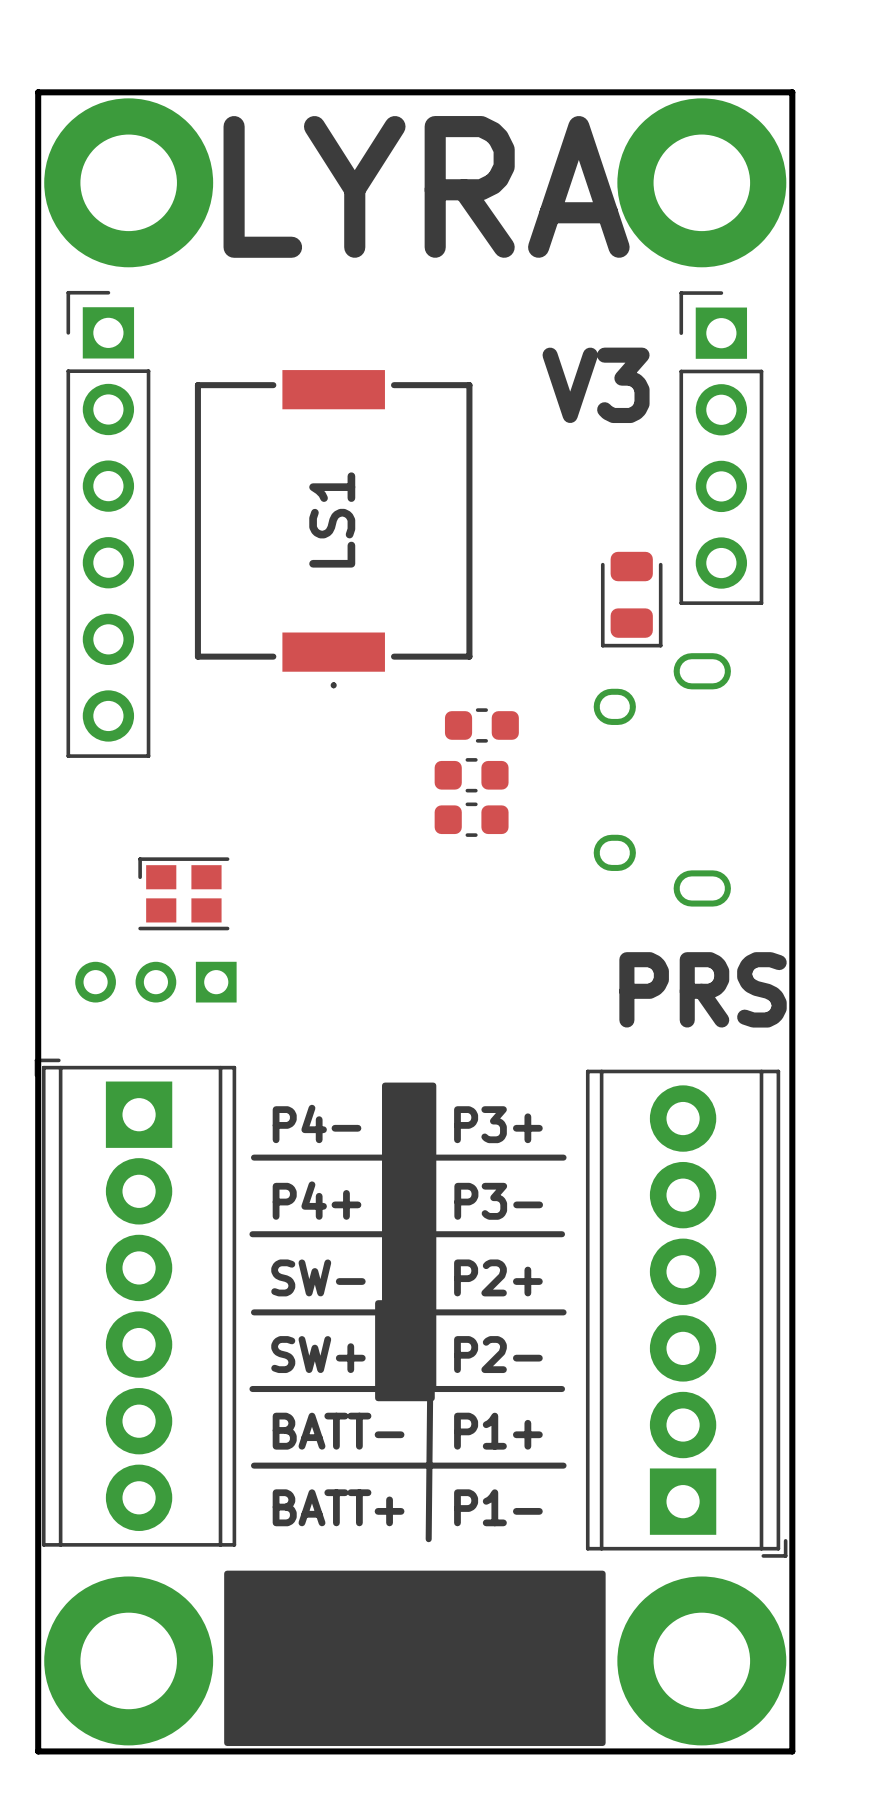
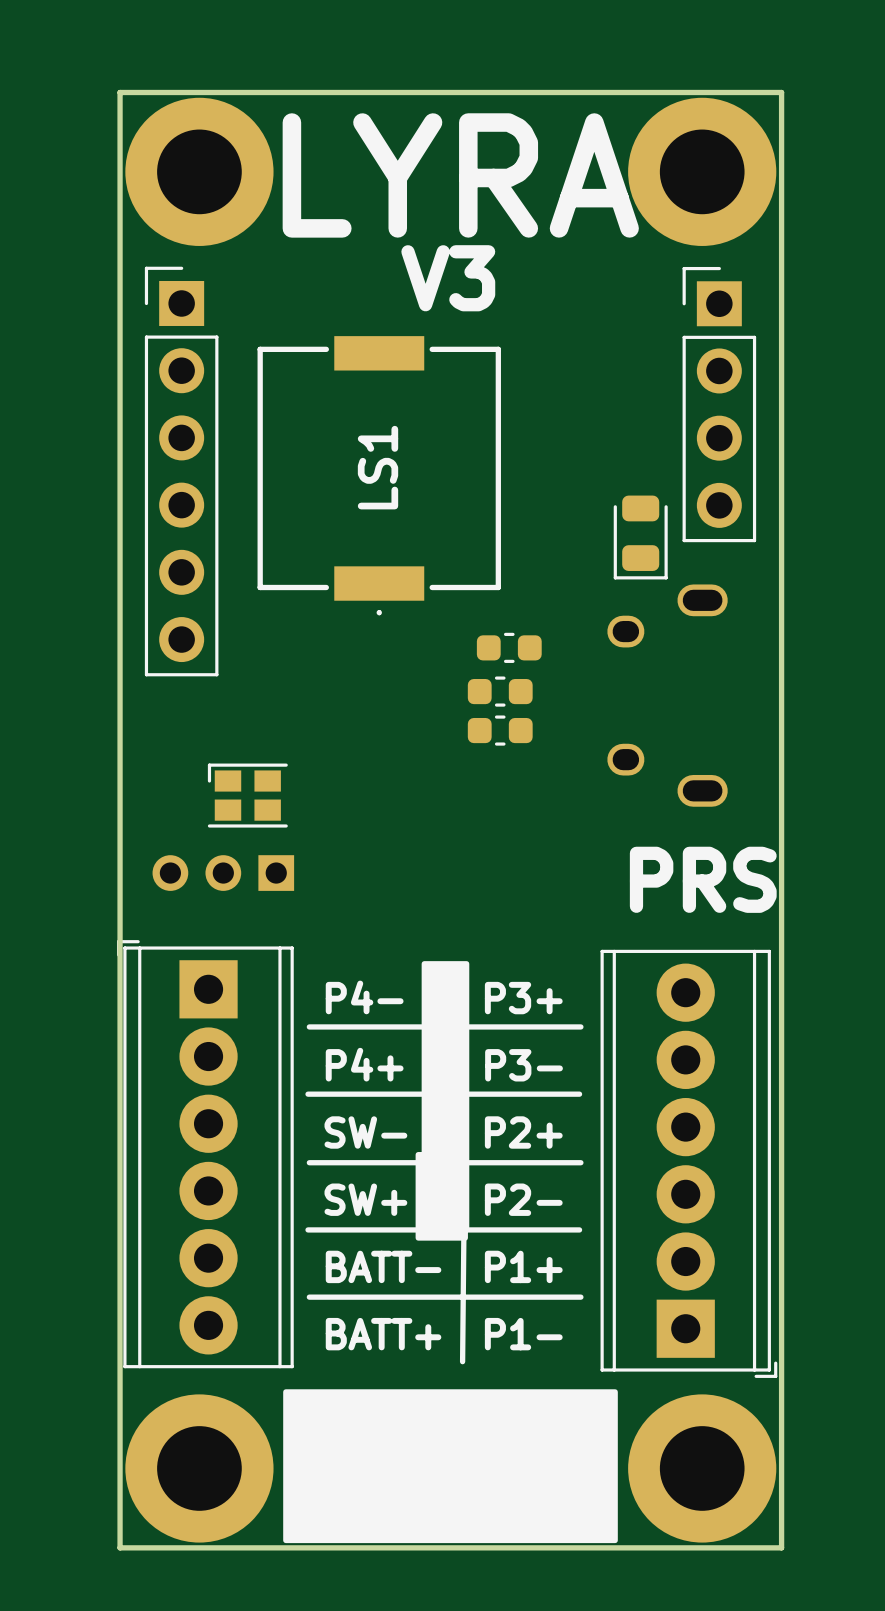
text position: V3 (596, 385) -> V3 (448, 278)

